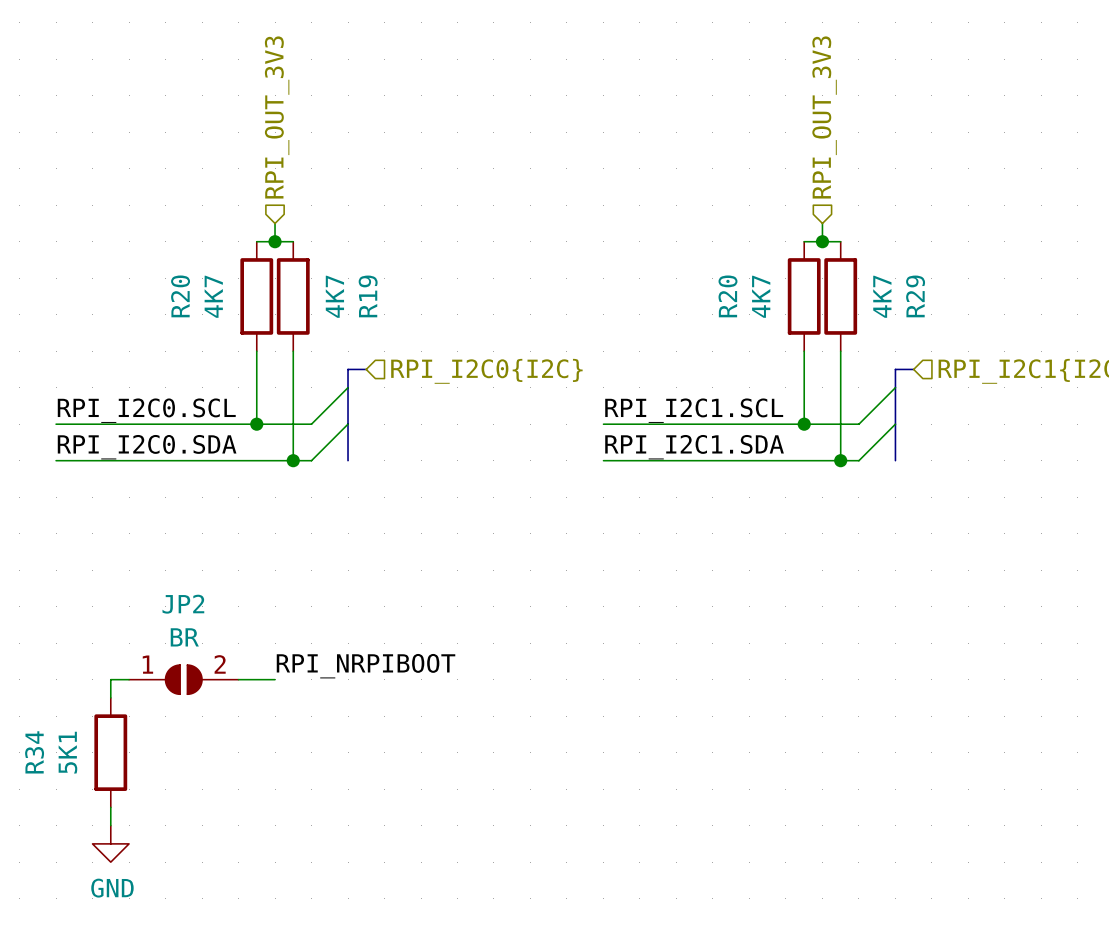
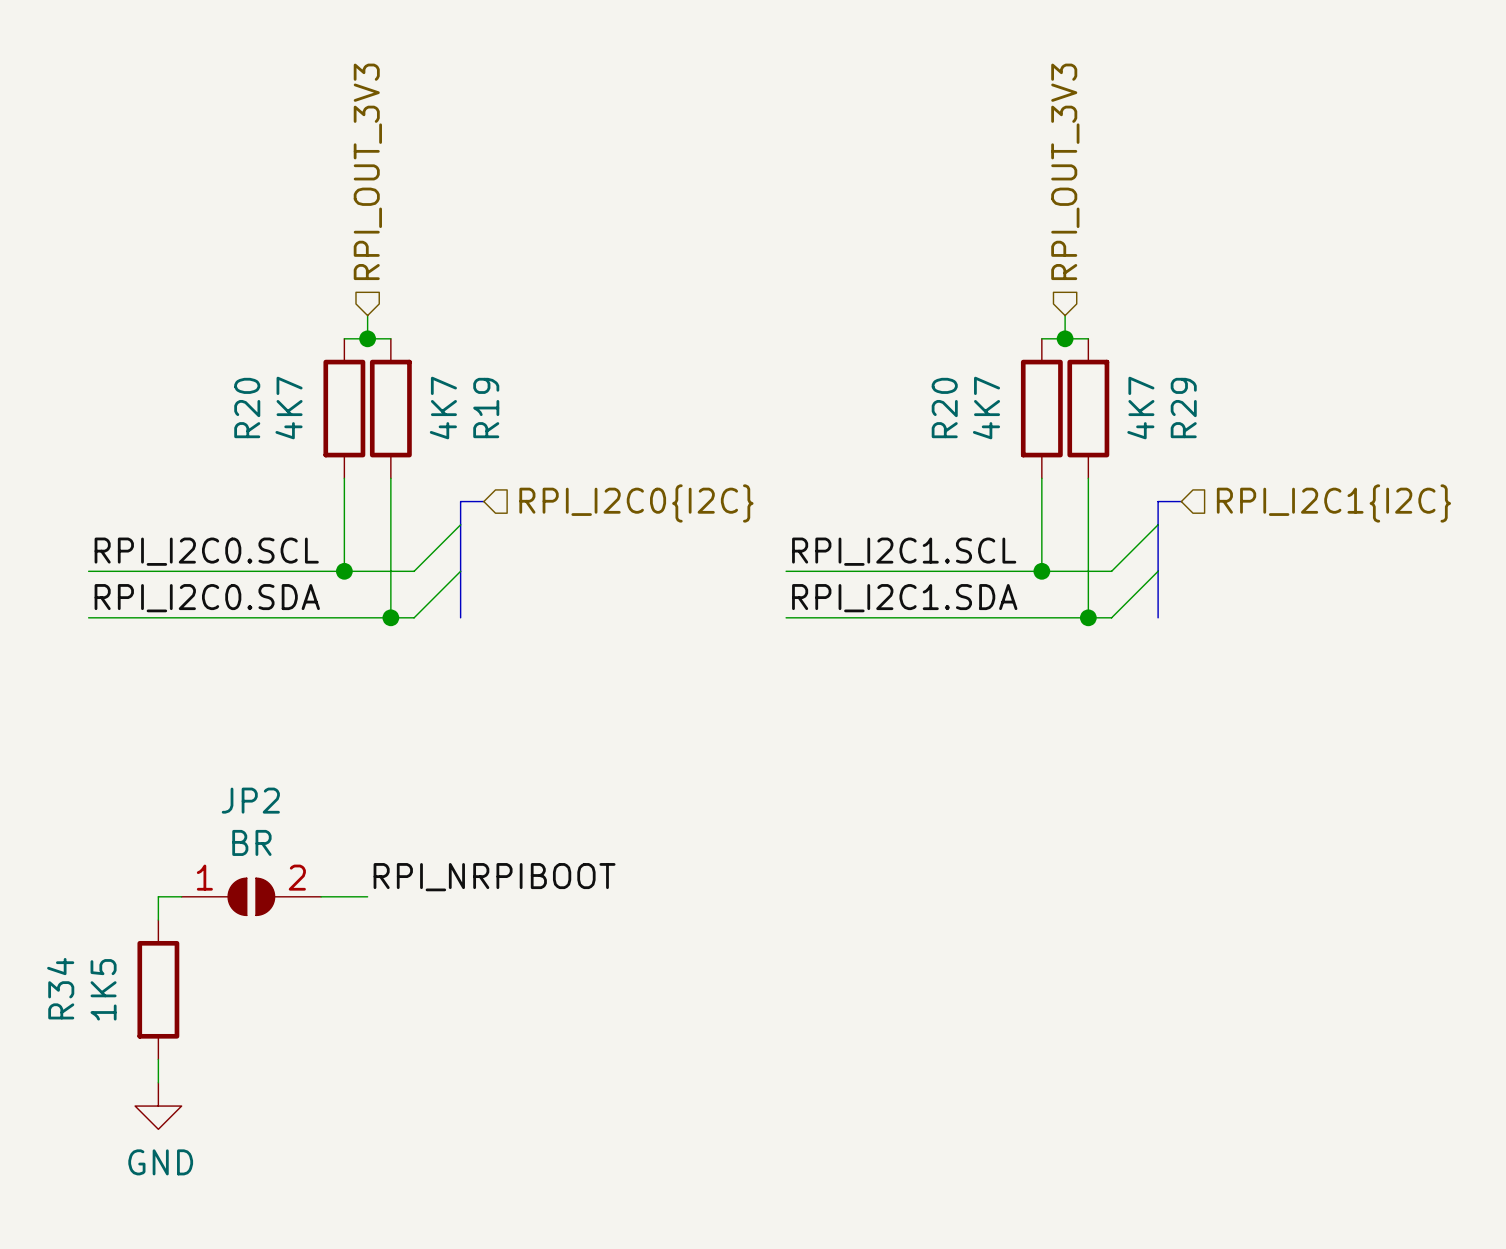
R34 value: 5K1 (67, 752) -> 1K5 (103, 989)

